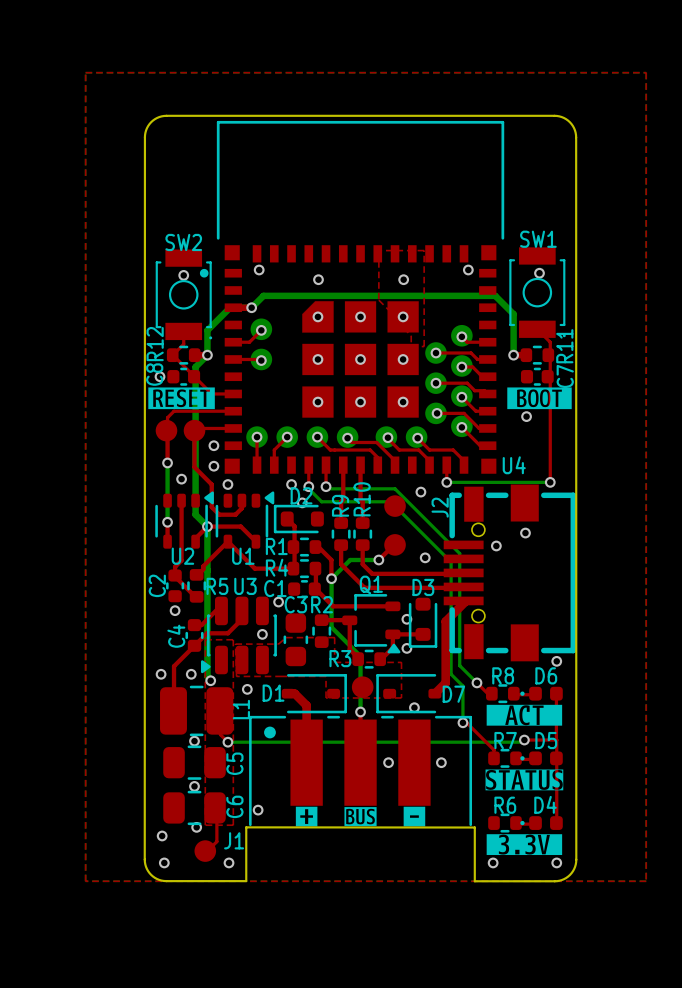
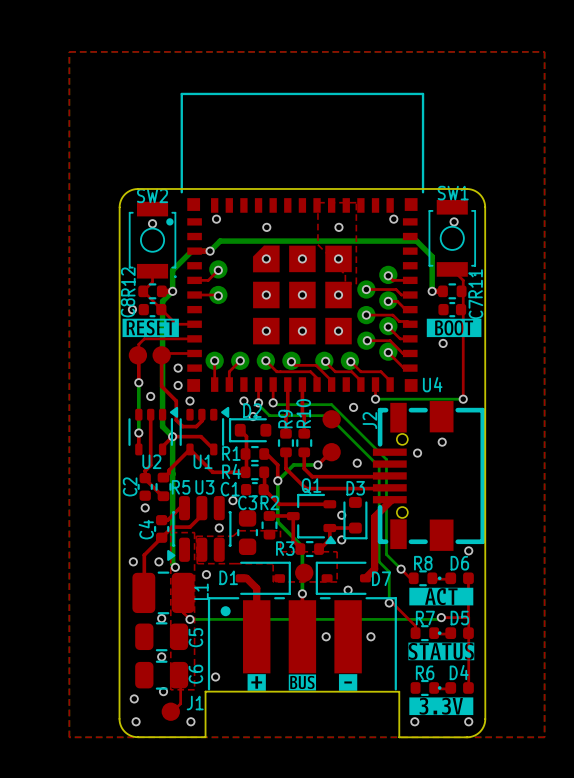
board edge: (144, 255) (145, 134) (151, 122) (157, 117) (166, 115) (561, 117) (571, 123) (576, 134) (576, 255) -> (119, 207) (124, 194) (137, 188) (466, 188) (479, 194) (485, 207)

